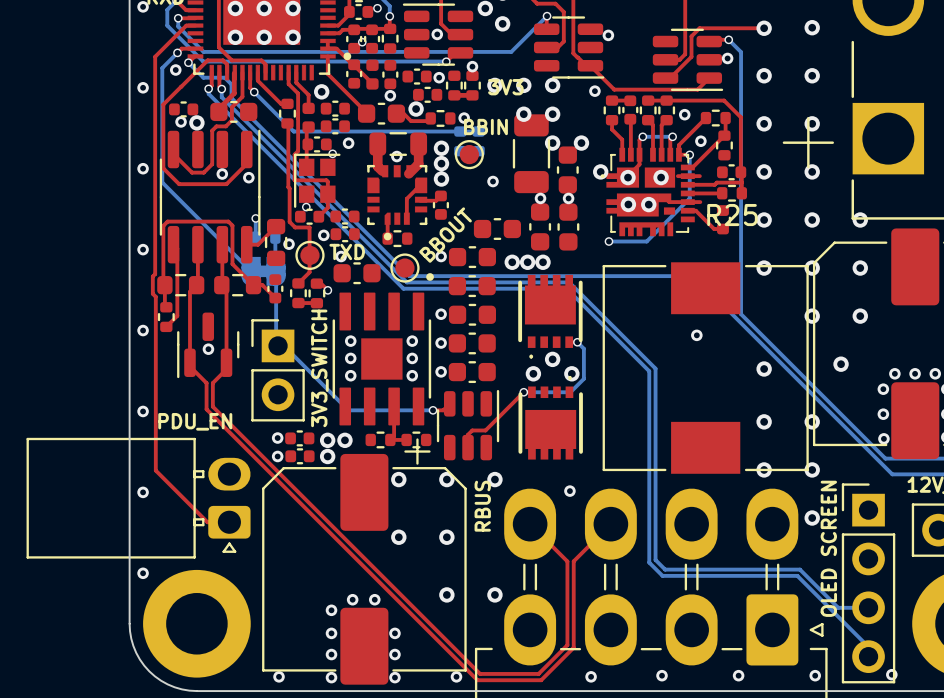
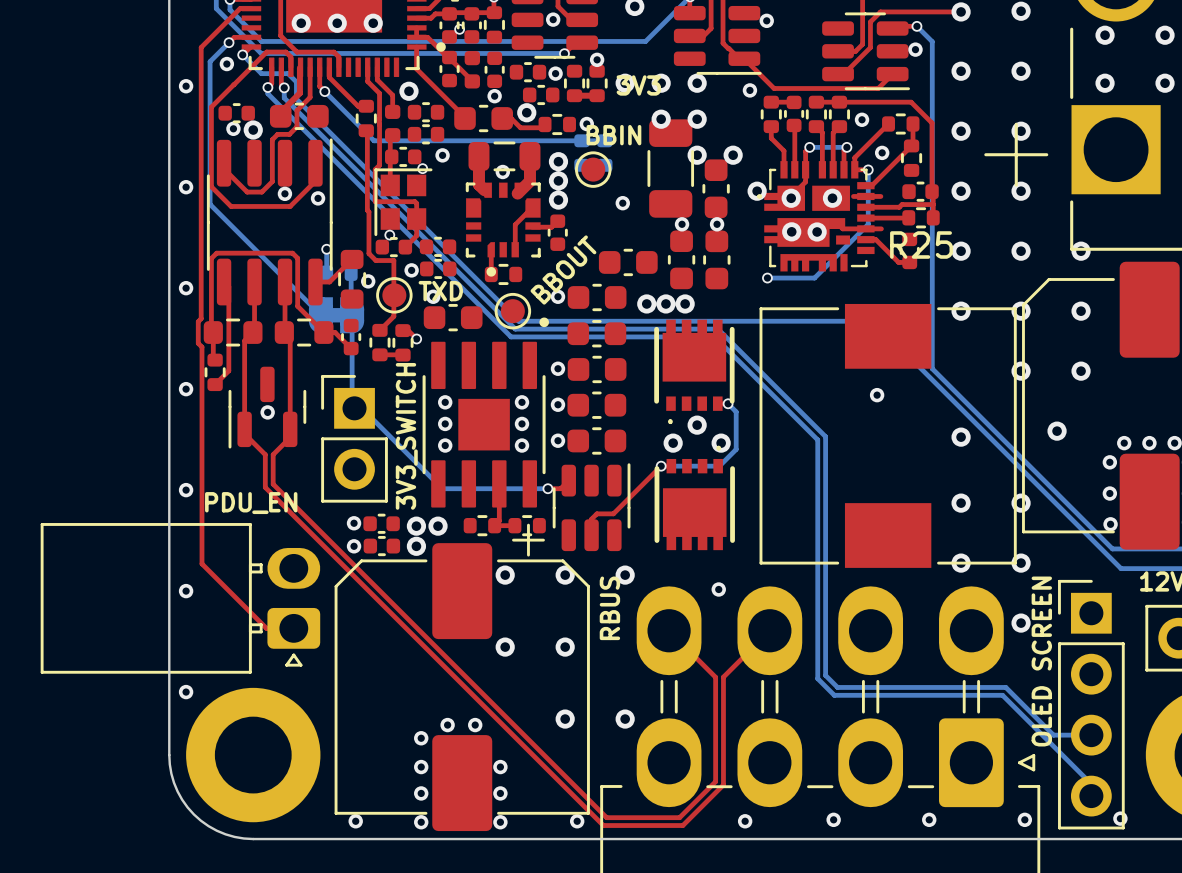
via: none -> (1105, 35)
via: none -> (1165, 35)
via: none -> (1105, 83)
via: none -> (1165, 83)

